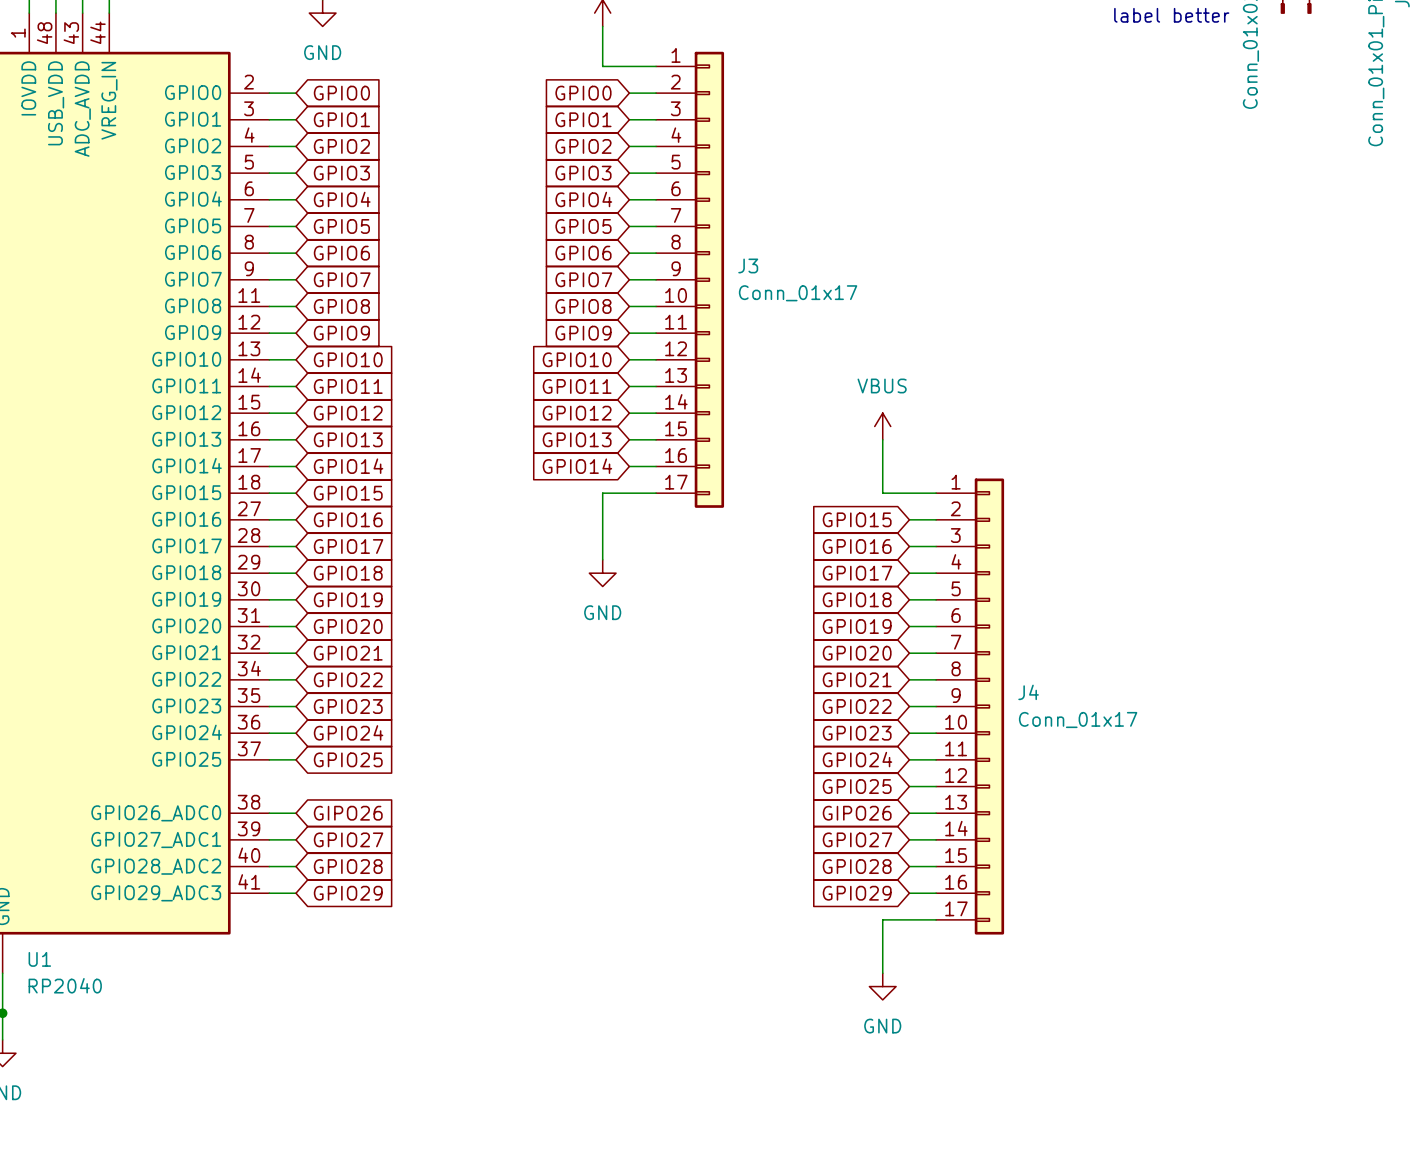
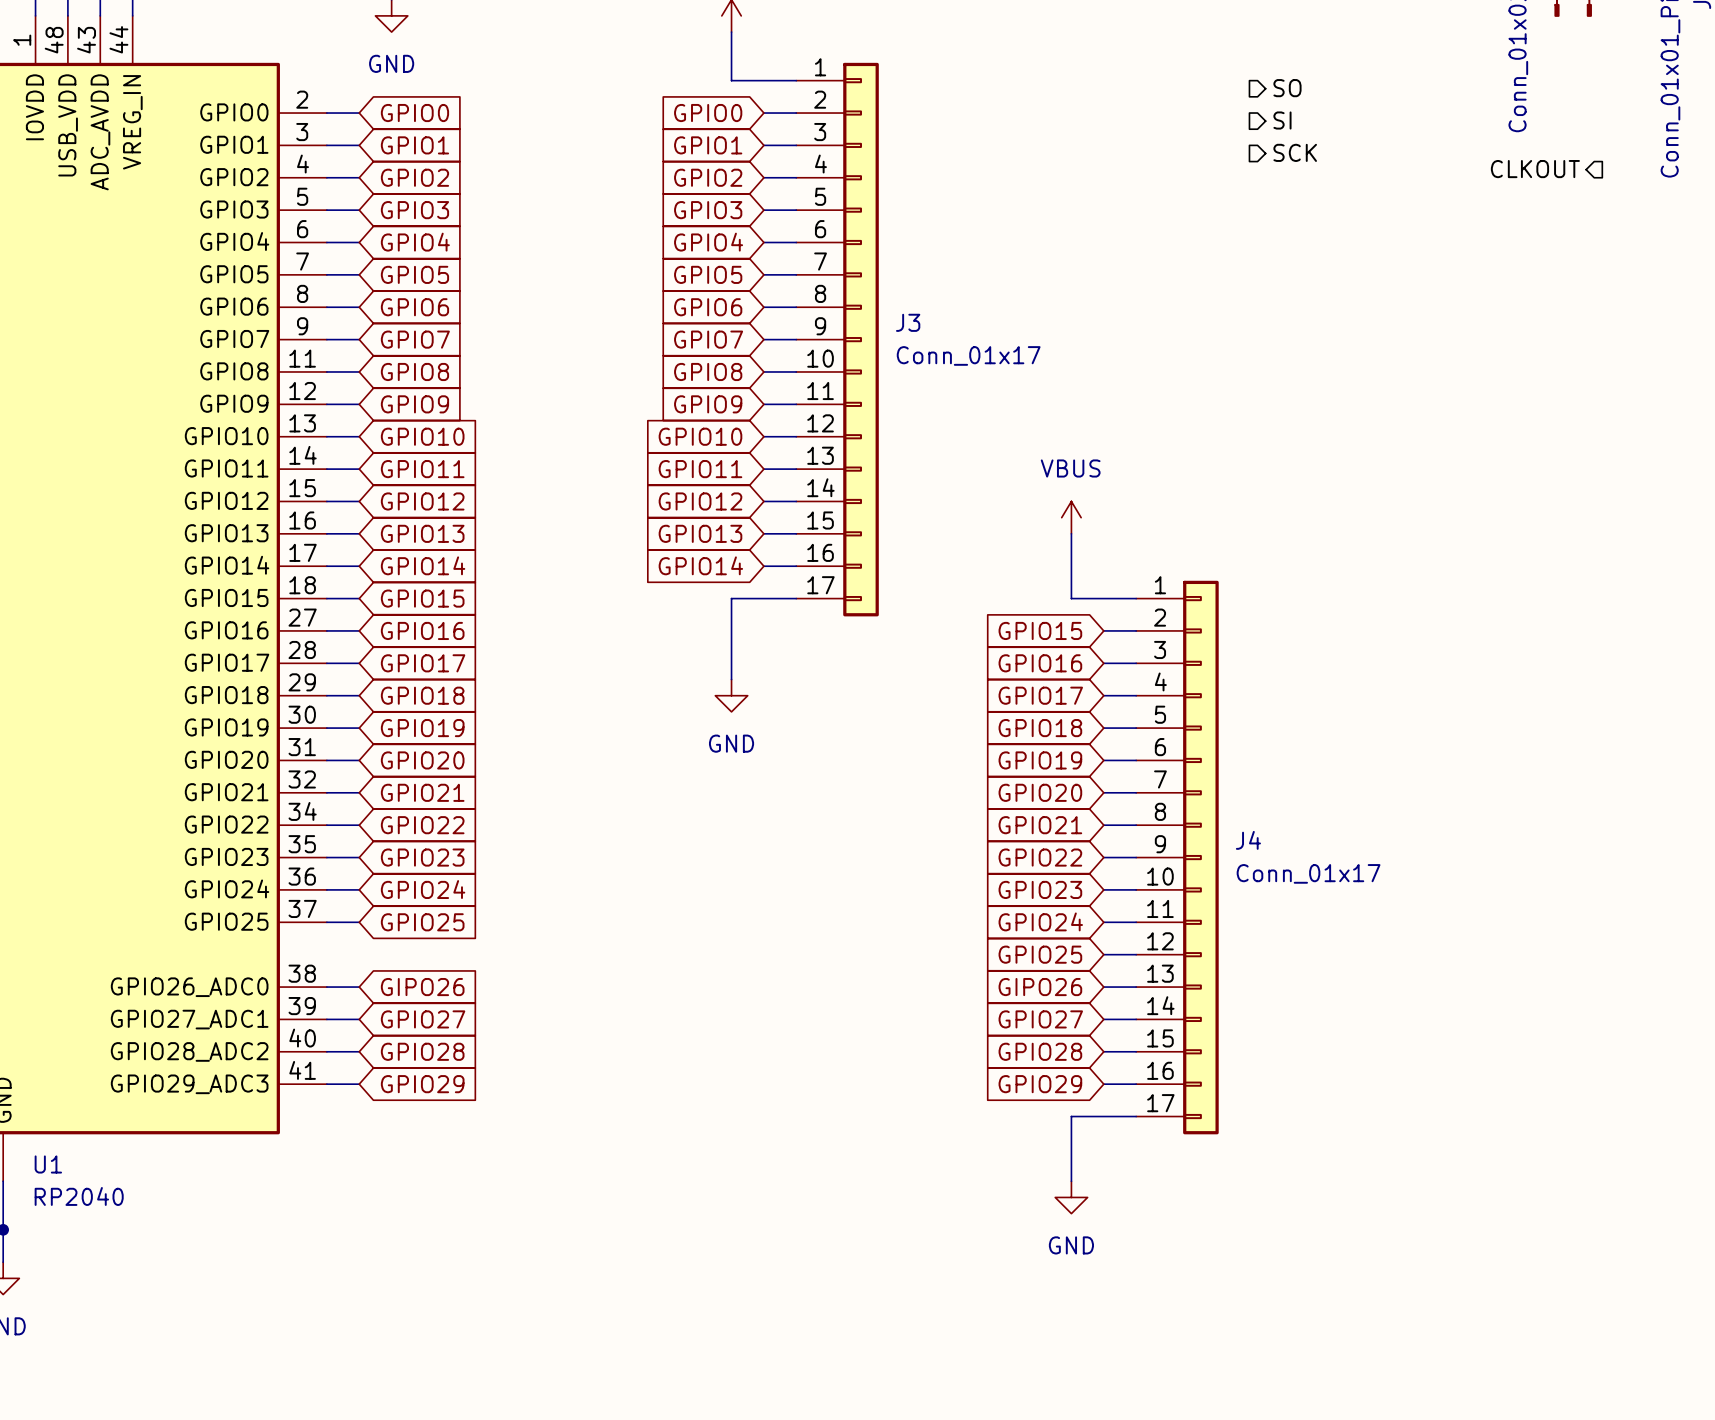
text: label better (1171, 15) -> none
sheet pin: none -> SO (1287, 88)
sheet pin: none -> SI (1282, 120)
sheet pin: none -> SCK (1295, 152)
sheet pin: none -> CLKOUT (1535, 169)

